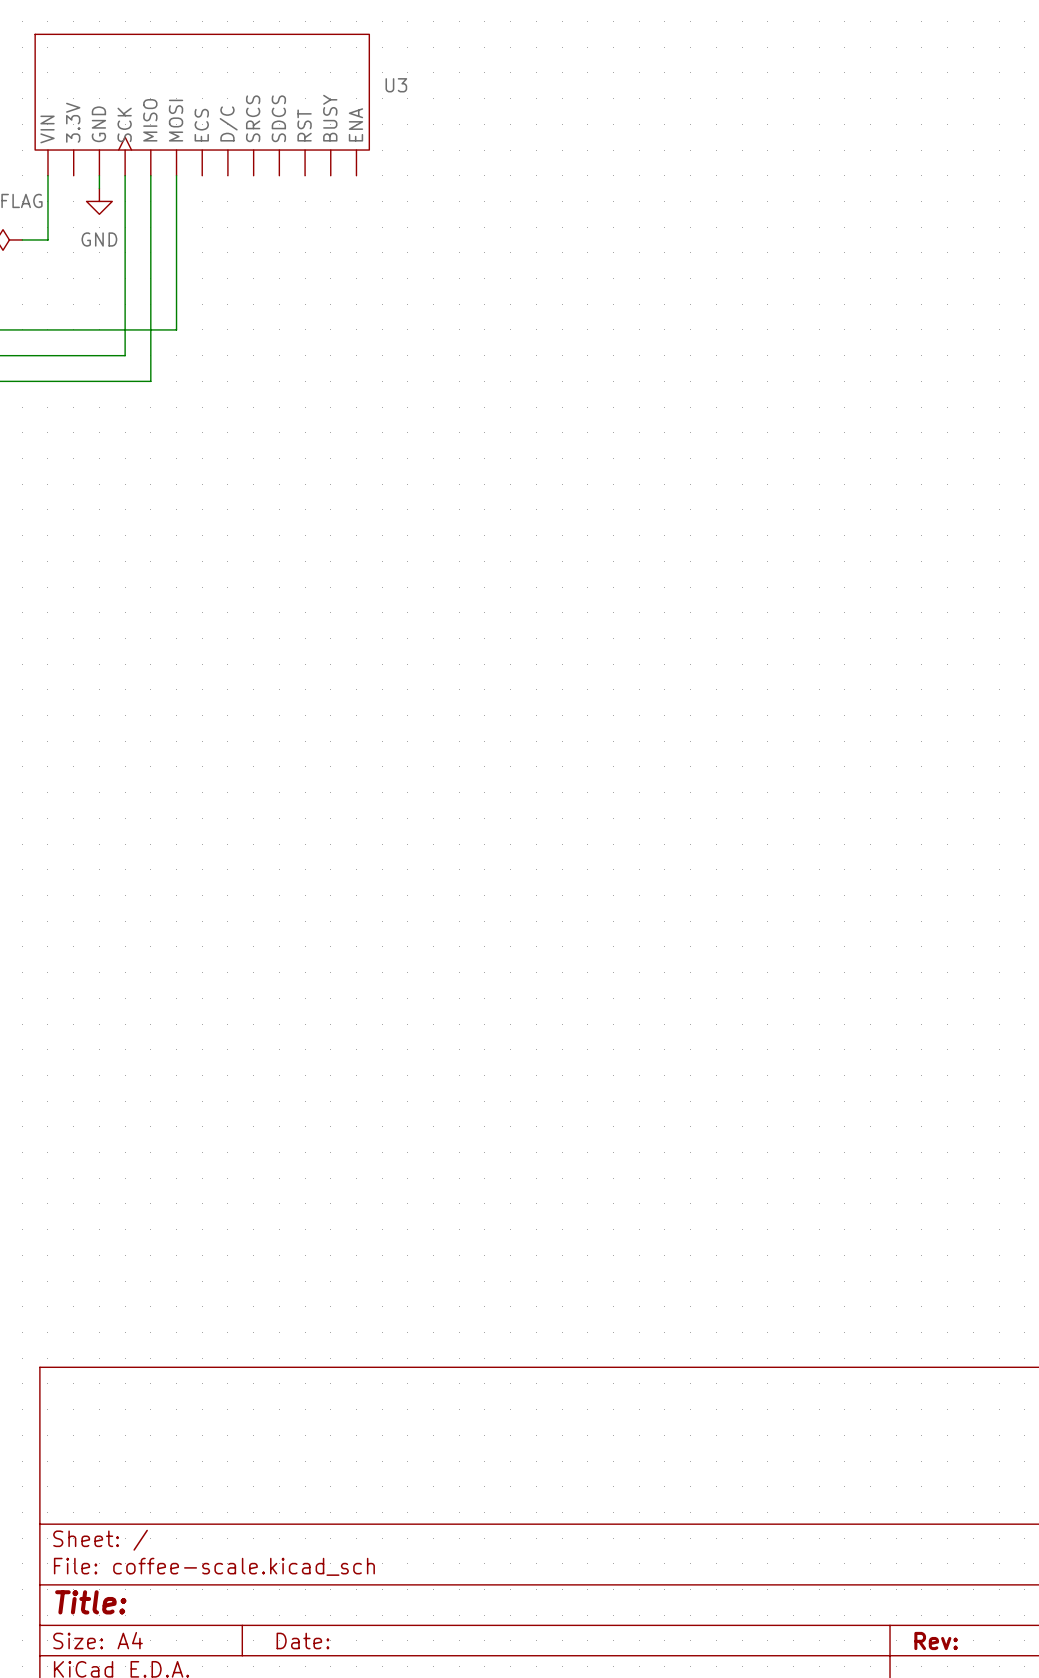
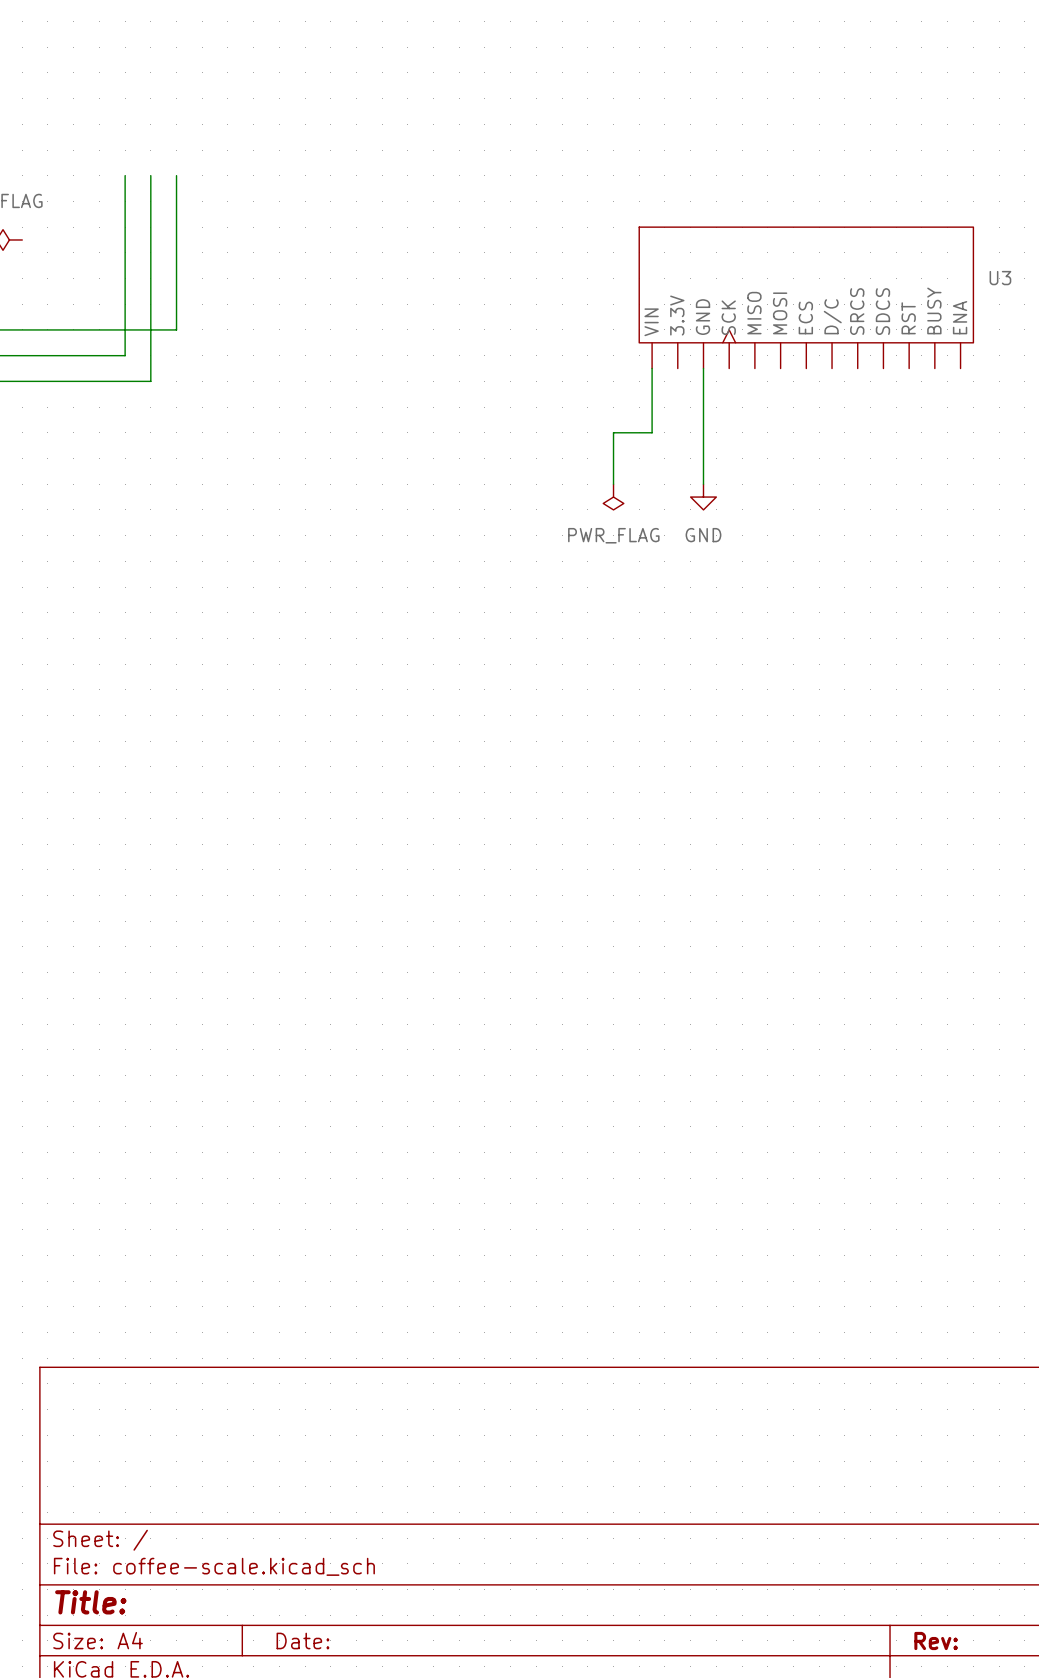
U3 position: (202, 105) -> (806, 297)
wire: (47, 175) (47, 239) (22, 239) -> none
wire: (99, 175) (99, 188) -> none
power symbol: GND (99, 201) -> none
wire: none -> (652, 368) (652, 432) (613, 432) (613, 484)
wire: none -> (703, 368) (703, 484)
power symbol: none -> PWR_FLAG (613, 497)
power symbol: none -> GND (703, 497)

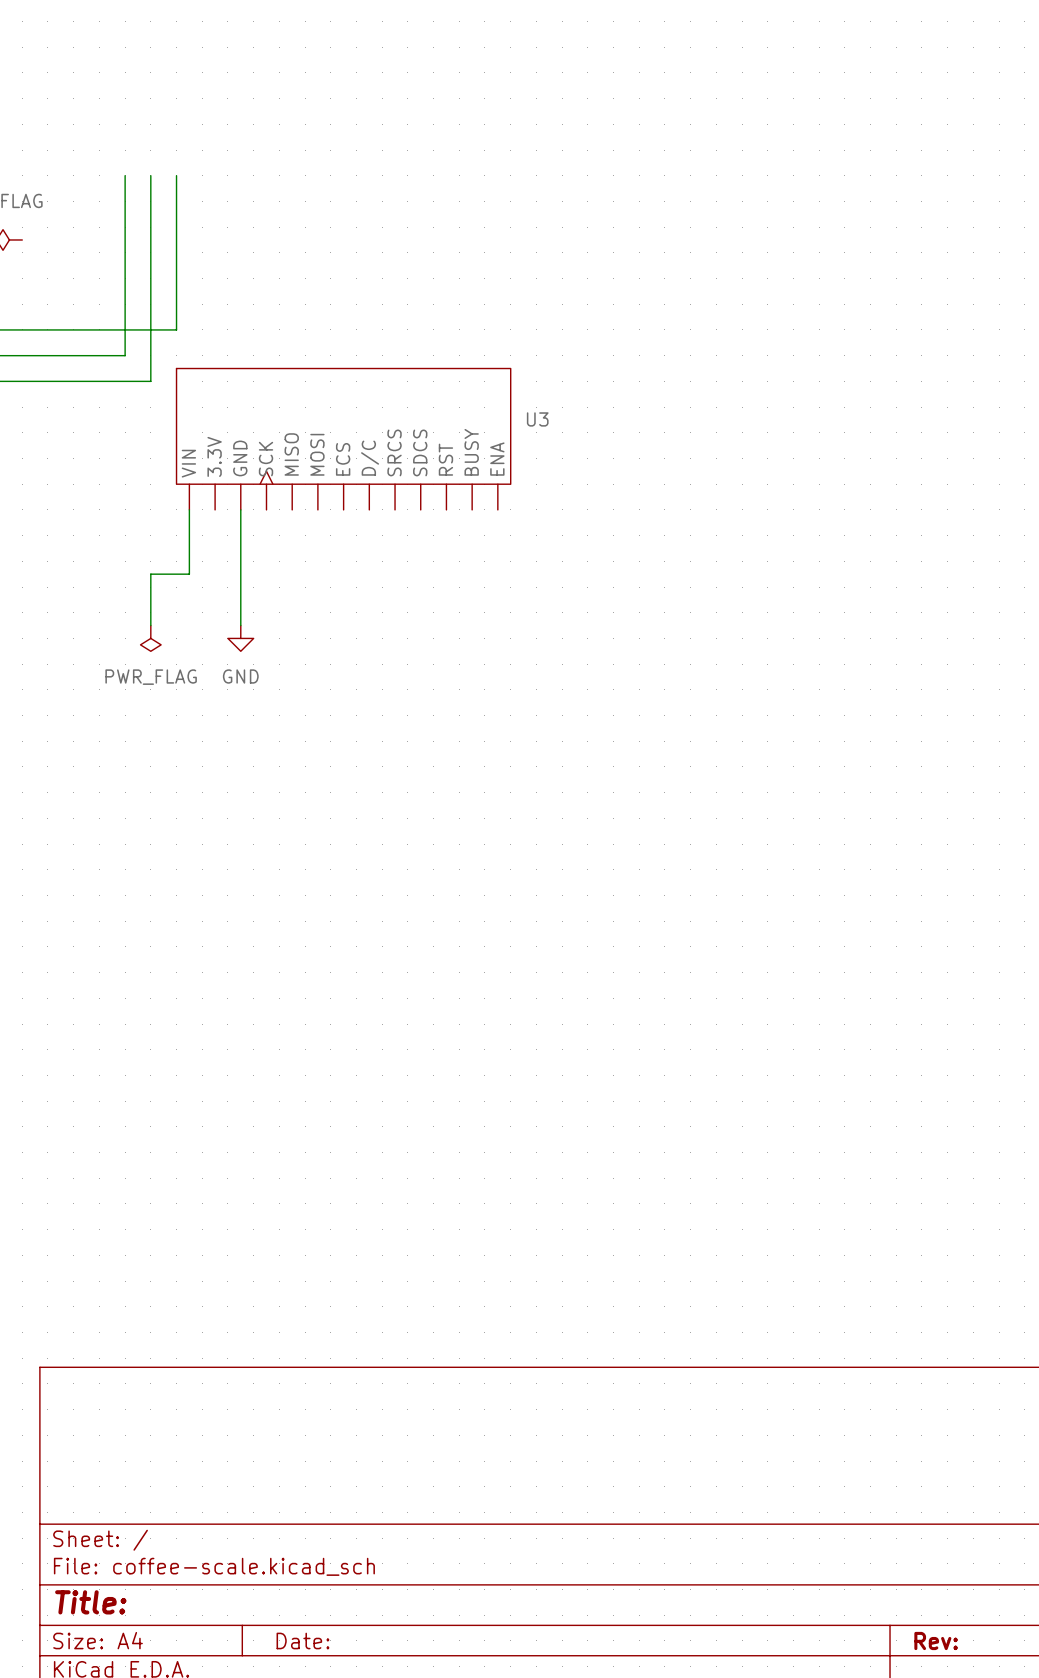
U3 position: (806, 297) -> (343, 439)
wire: (652, 368) (652, 432) (613, 432) (613, 484) -> none
wire: (703, 368) (703, 484) -> none
power symbol: PWR_FLAG (613, 497) -> none
power symbol: GND (703, 497) -> none
wire: none -> (189, 509) (189, 574) (150, 574) (150, 625)
wire: none -> (240, 509) (240, 625)
power symbol: none -> PWR_FLAG (150, 638)
power symbol: none -> GND (240, 638)

